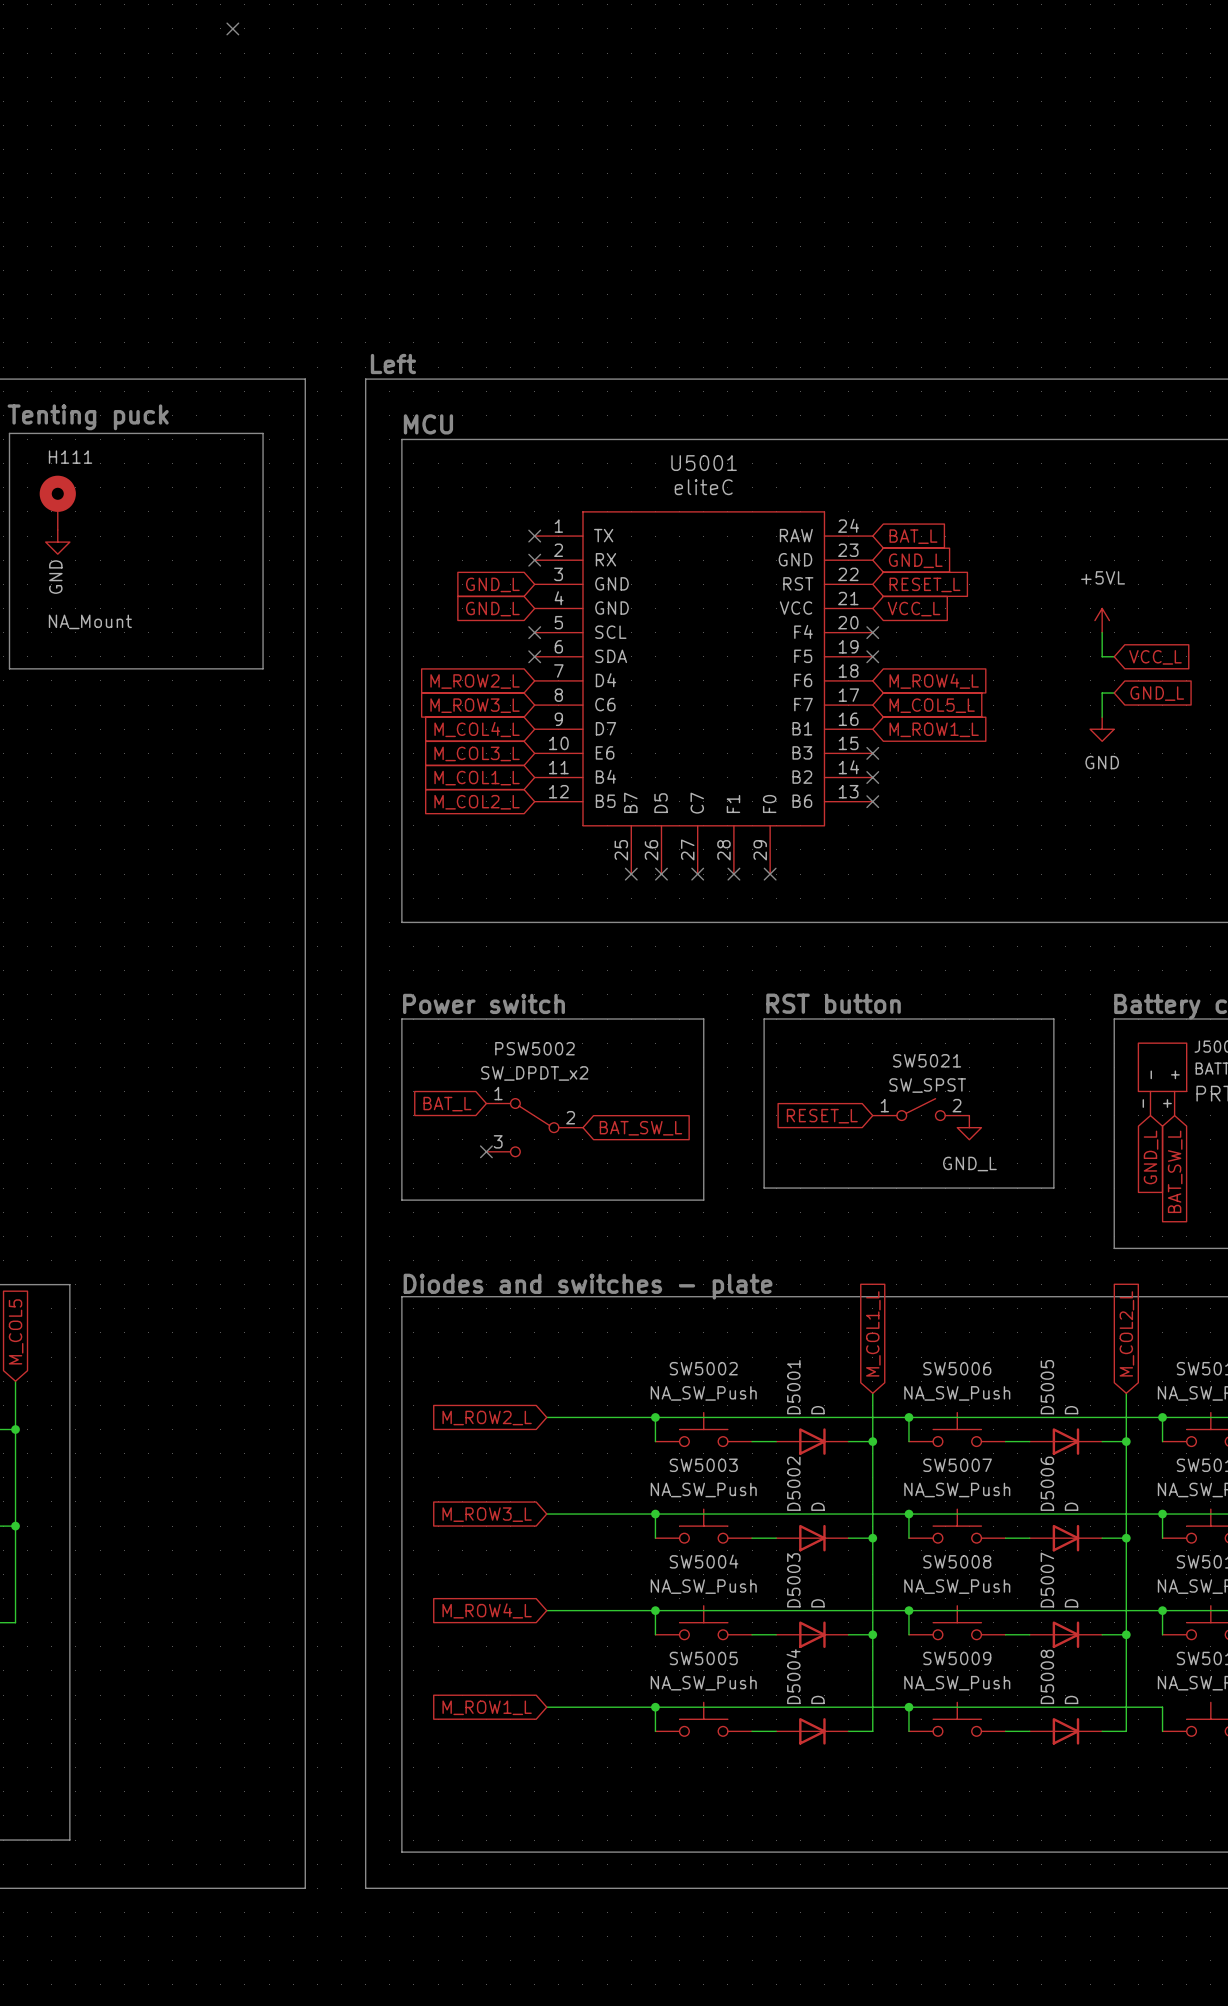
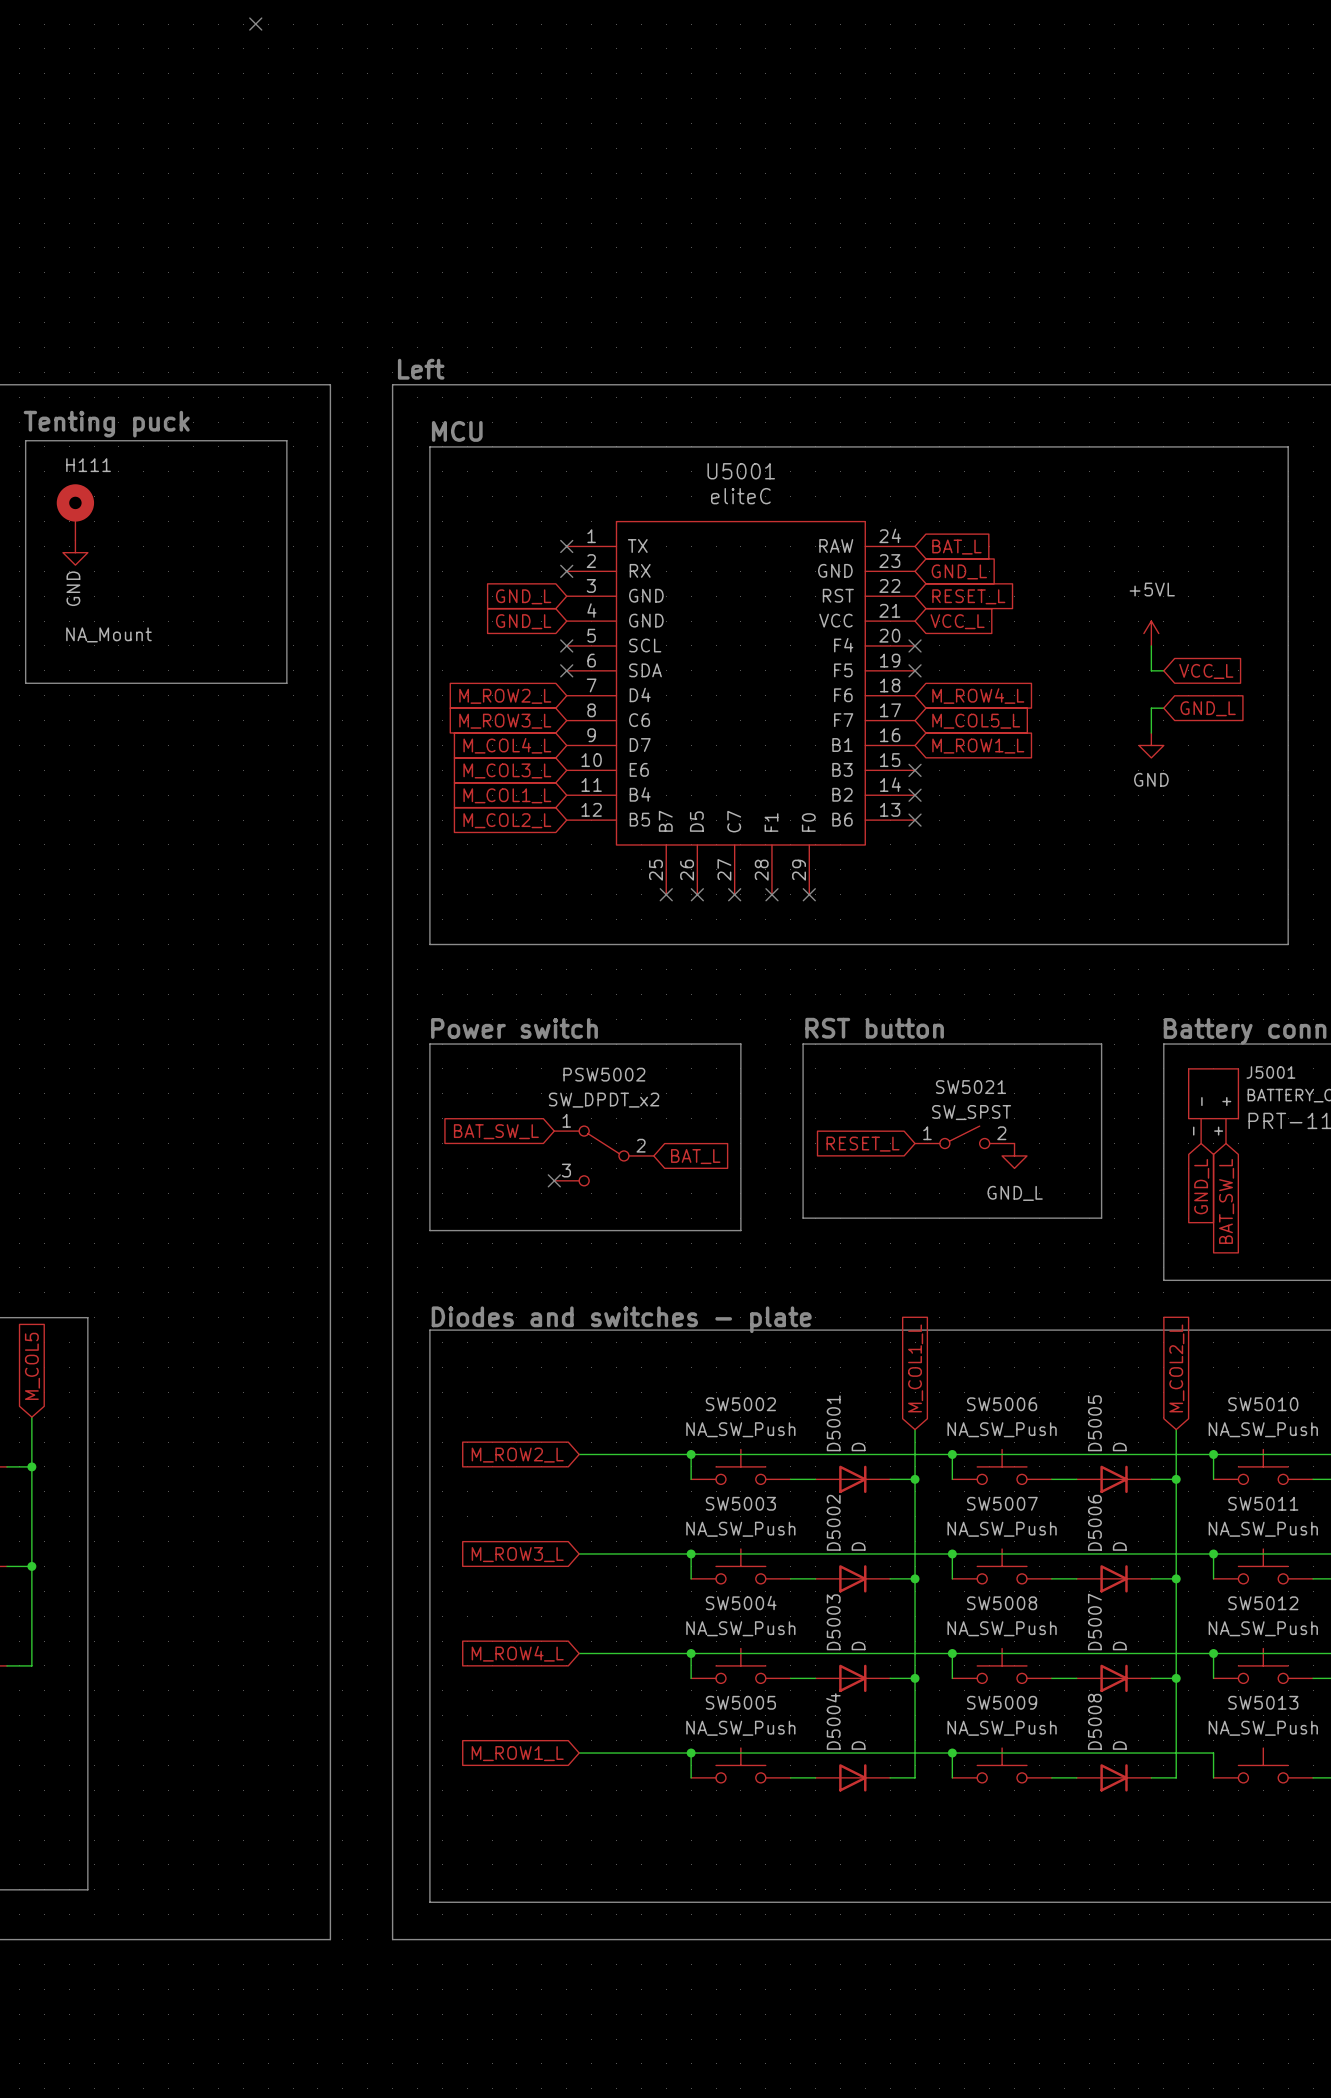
global label rotation: 0° (447, 1104) -> 180° (695, 1156)
global label position: BAT_L (447, 1104) -> BAT_L (695, 1156)
PSW5002 position: (534, 1127) -> (604, 1155)
global label rotation: 0° (640, 1128) -> 180° (496, 1131)
global label position: BAT_SW_L (640, 1128) -> BAT_SW_L (496, 1131)
no-connect mark position: (486, 1151) -> (554, 1180)

